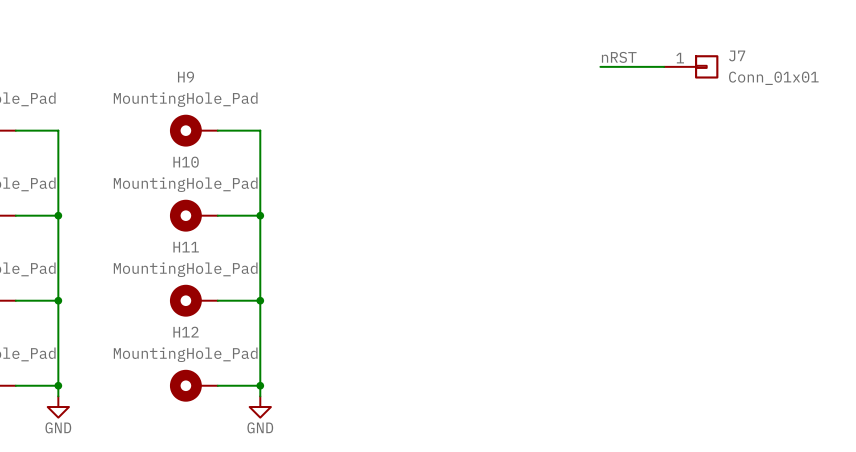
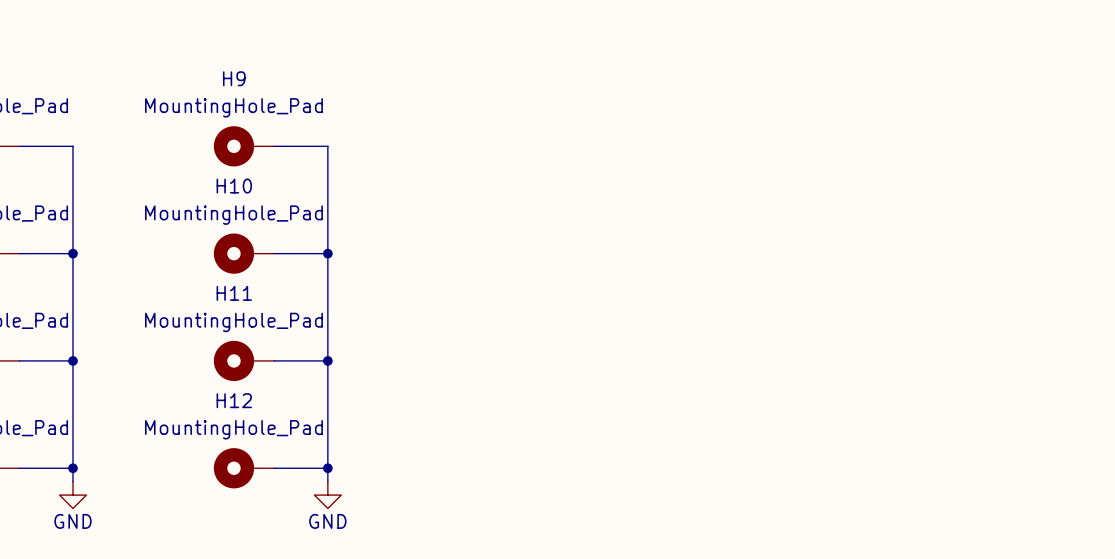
label: nRST (619, 57) -> none
wire: (600, 66) (664, 66) -> none
J7: Conn_01x01 (691, 66) -> none

